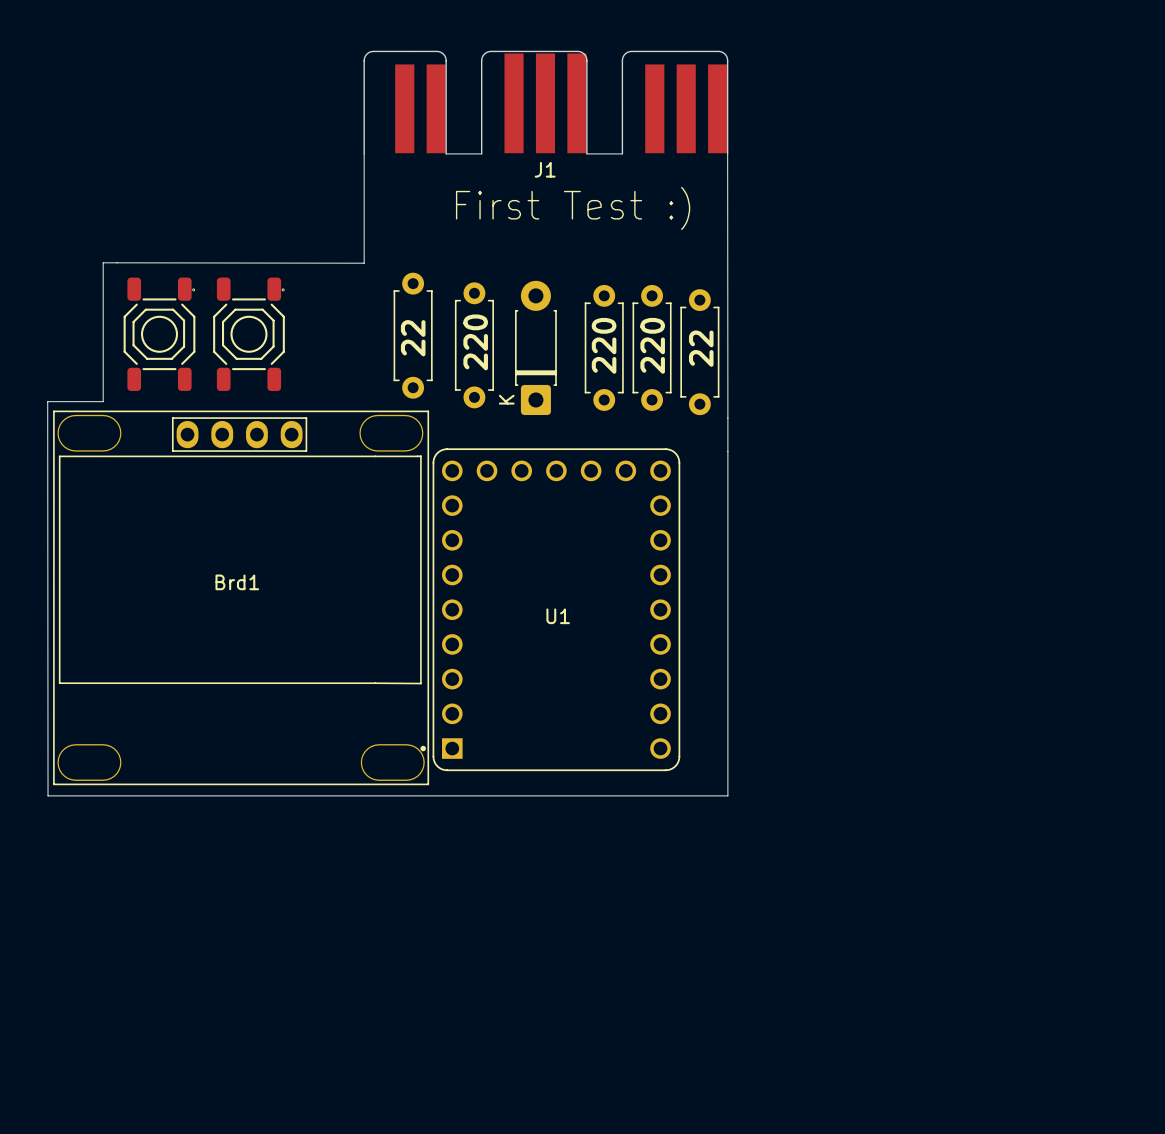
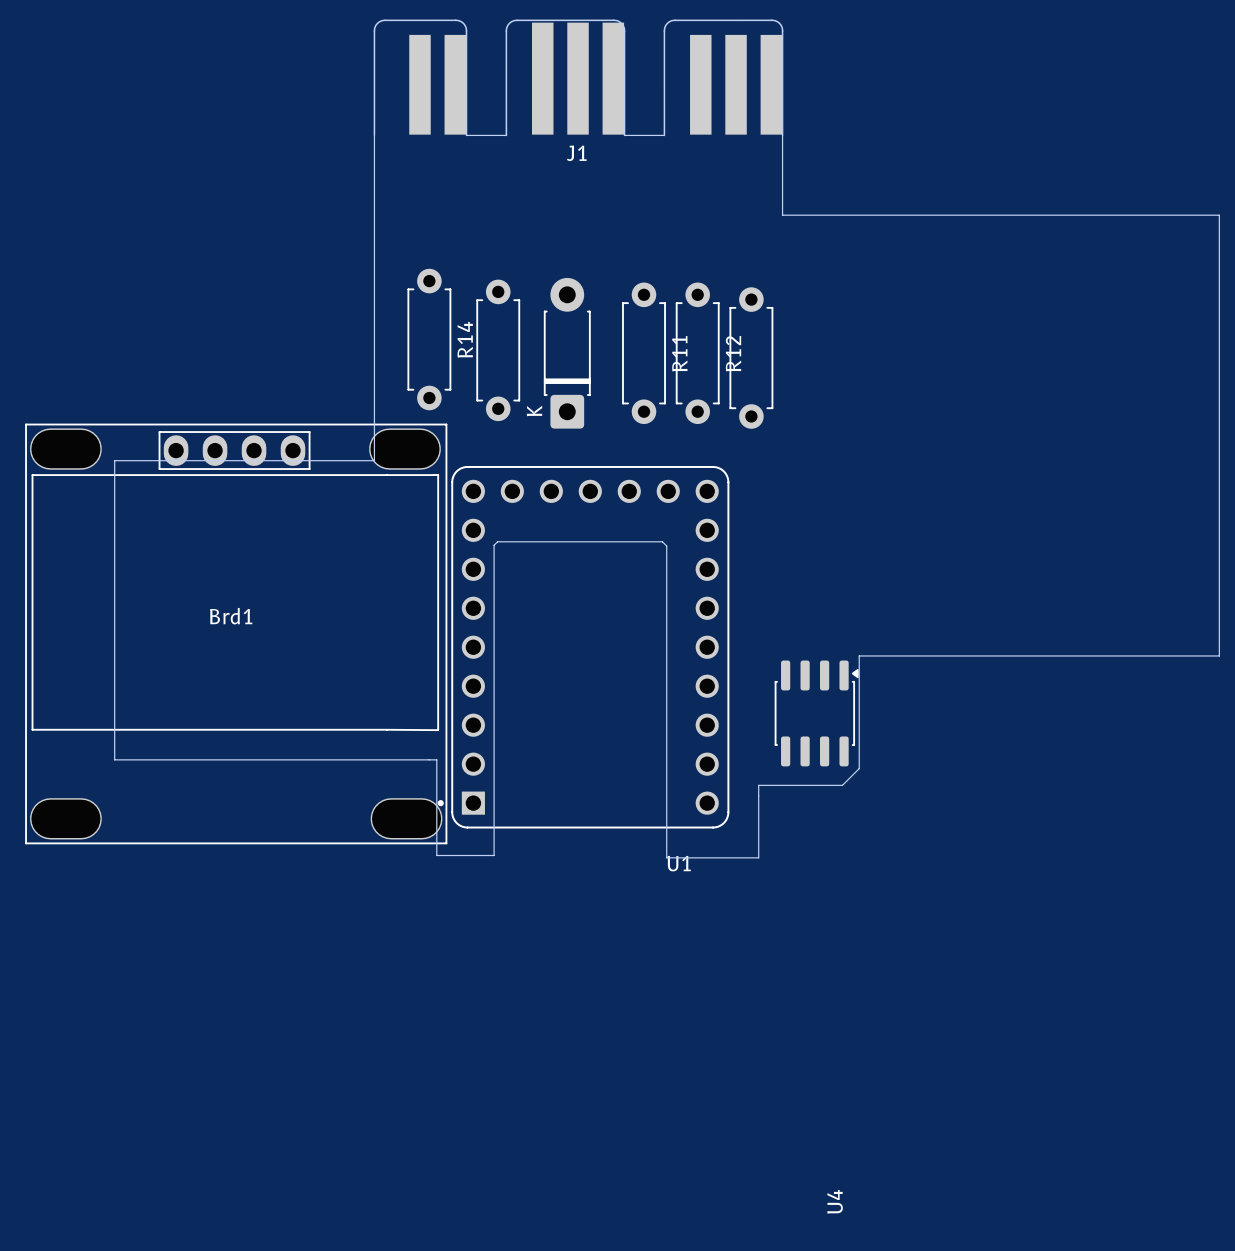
board edge: (727, 153) (727, 795) (48, 795) (47, 401) (103, 401) (103, 262) (364, 263) -> (782, 135) (782, 215) (1219, 215) (1219, 655) (859, 655) (859, 768) (842, 785) (758, 785) (758, 857) (666, 857) (666, 546) (662, 541) (497, 541) (494, 545) (494, 855) (436, 855) (436, 759) (114, 759) (114, 460) (374, 460) (374, 258)
text: First Test :) (573, 208) -> none
part: (159, 334) -> none
part: (248, 334) -> none
R14 name: none -> R14 (465, 339)
text: 22 (413, 338) -> none
text: 220 (475, 342) -> none
text: 220 (604, 345) -> none
text: 220 (652, 345) -> none
R11 name: none -> R11 (679, 353)
R12 name: none -> R12 (733, 353)
text: 22 (701, 348) -> none
U1 name position: U1 (558, 616) -> U1 (679, 863)
U4: none -> (816, 713)

